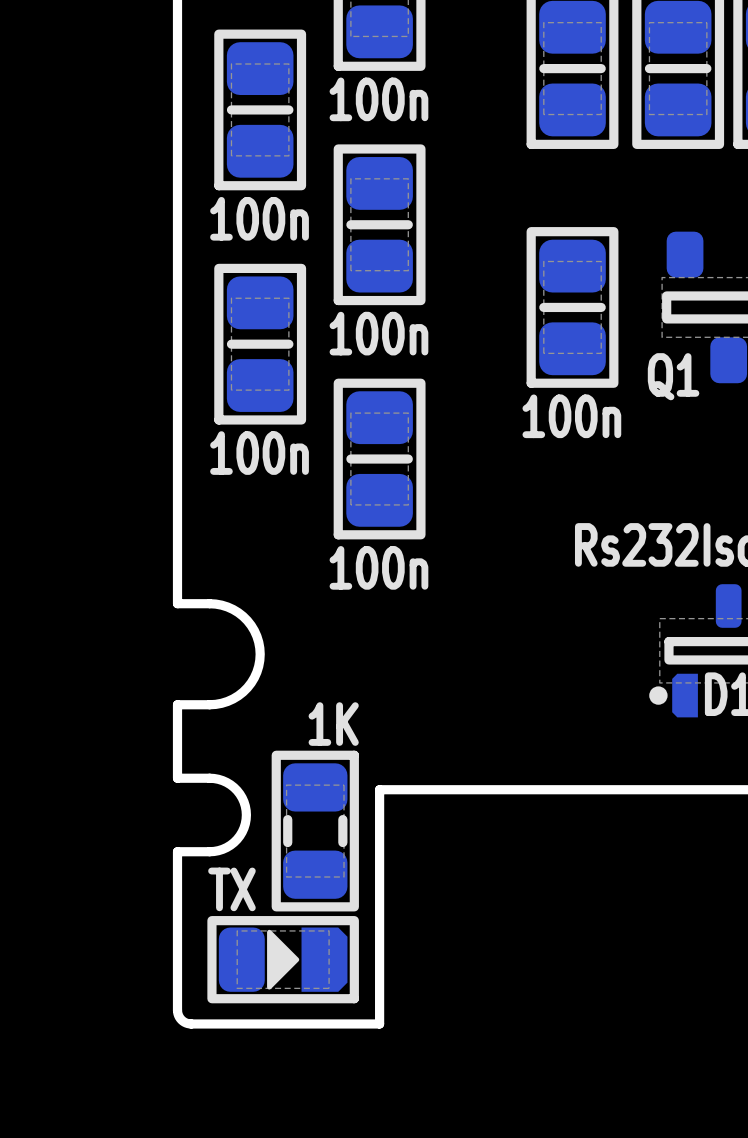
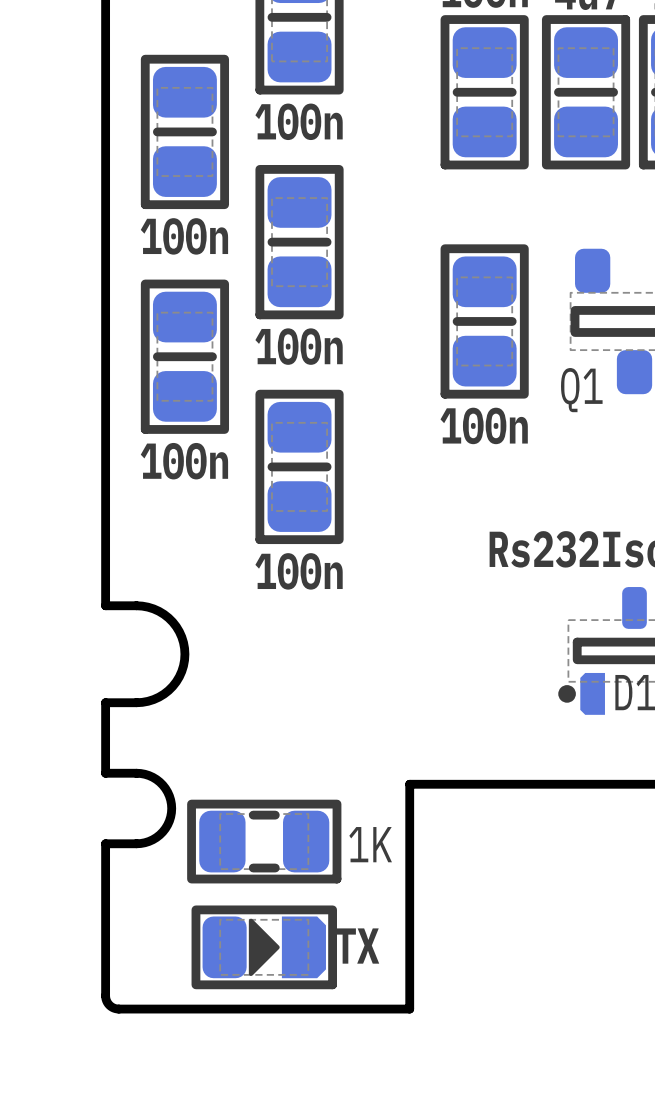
board edge: (494, 789) (379, 789) (379, 1023) -> (409, 784) (409, 1009) (299, 1009)
part rotation: 0° (315, 831) -> 90° clockwise (264, 841)
part value position: TX (231, 889) -> TX (357, 946)
part position: (283, 959) -> (264, 947)

